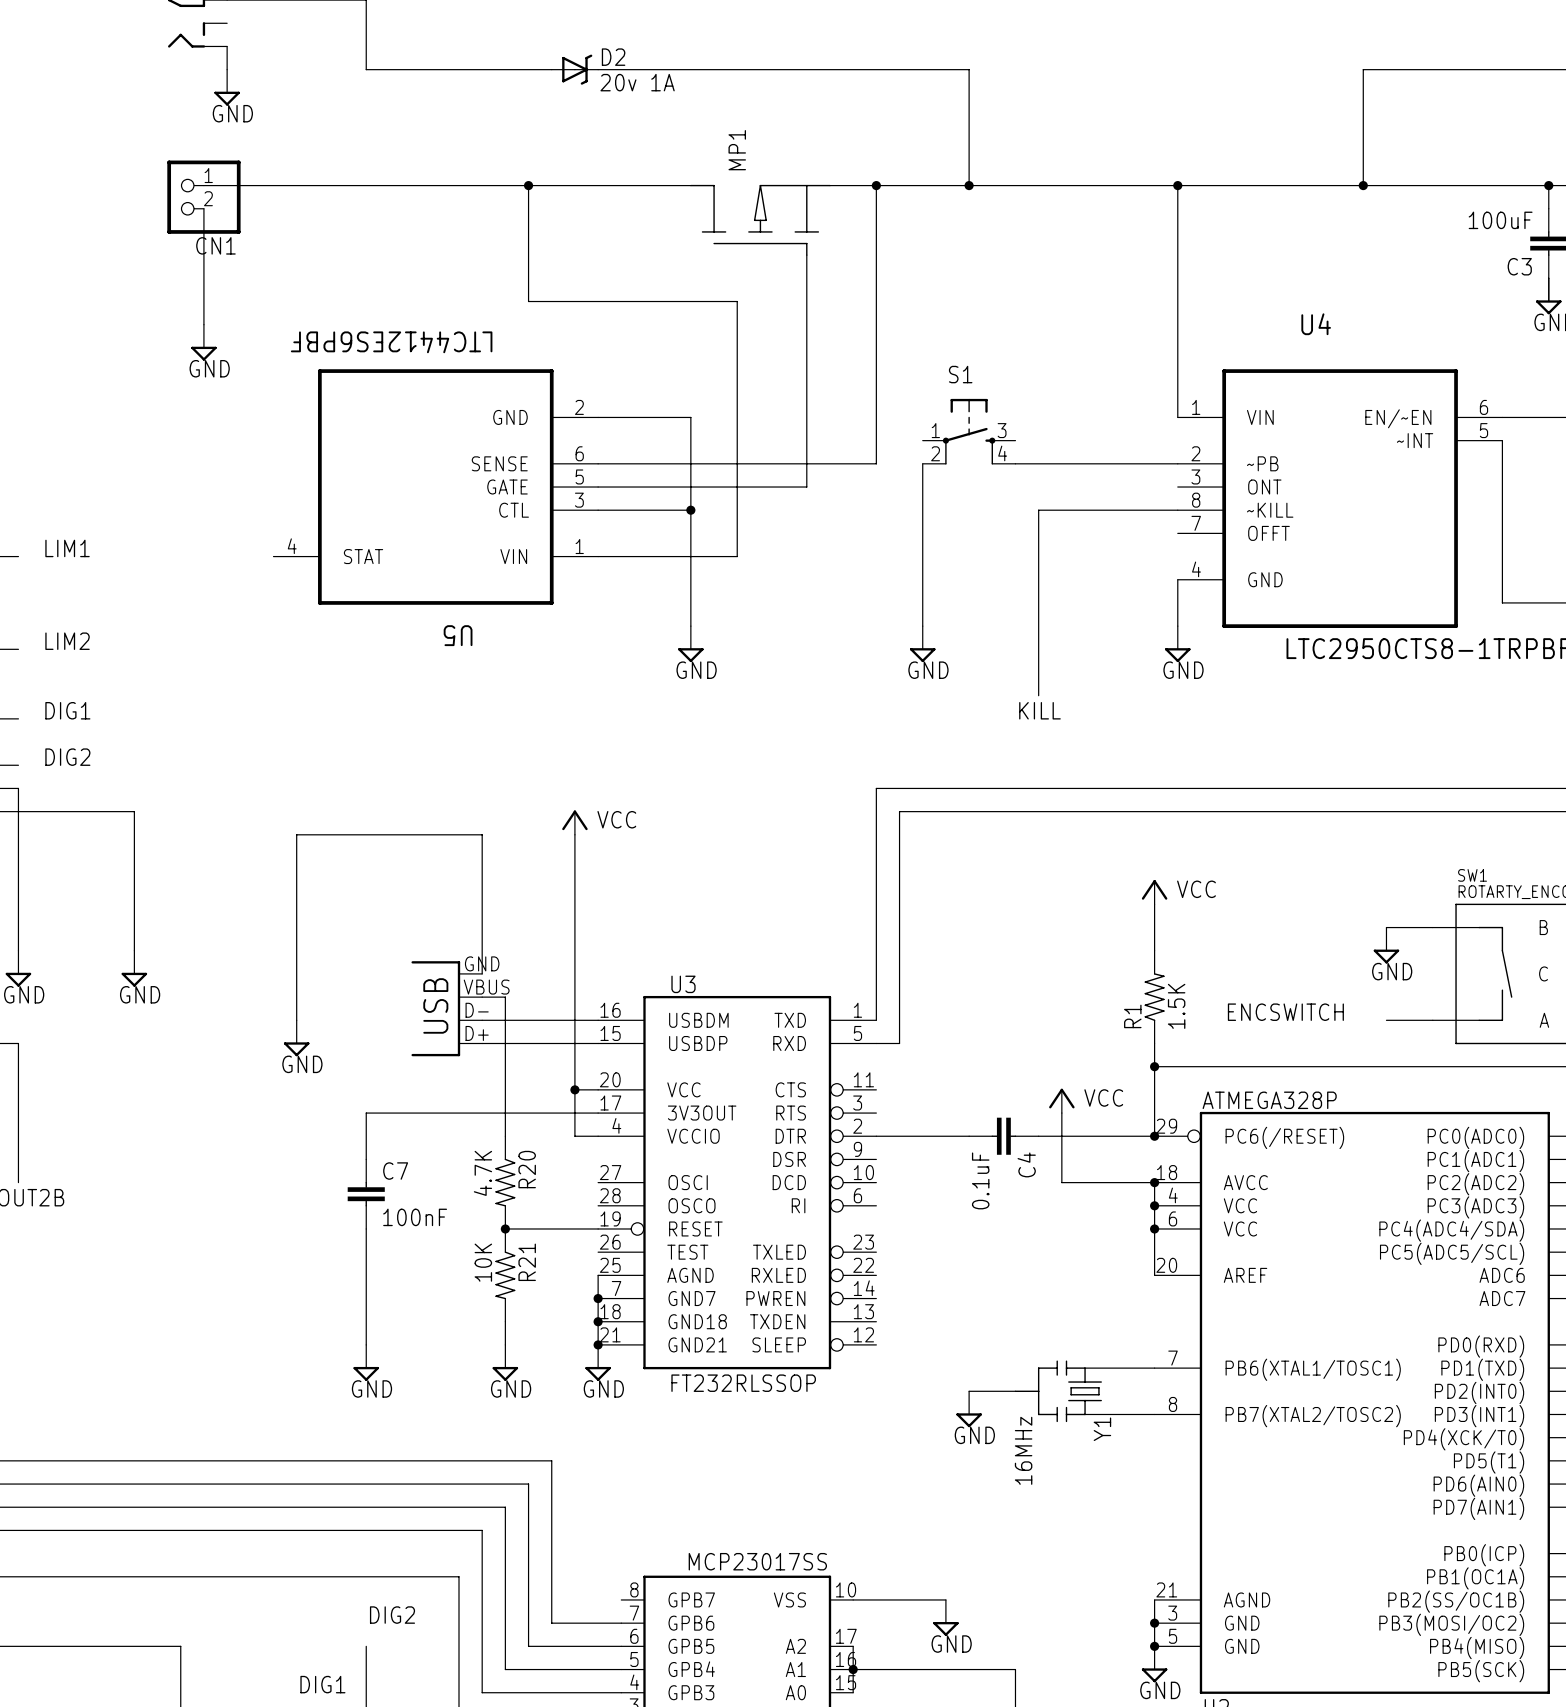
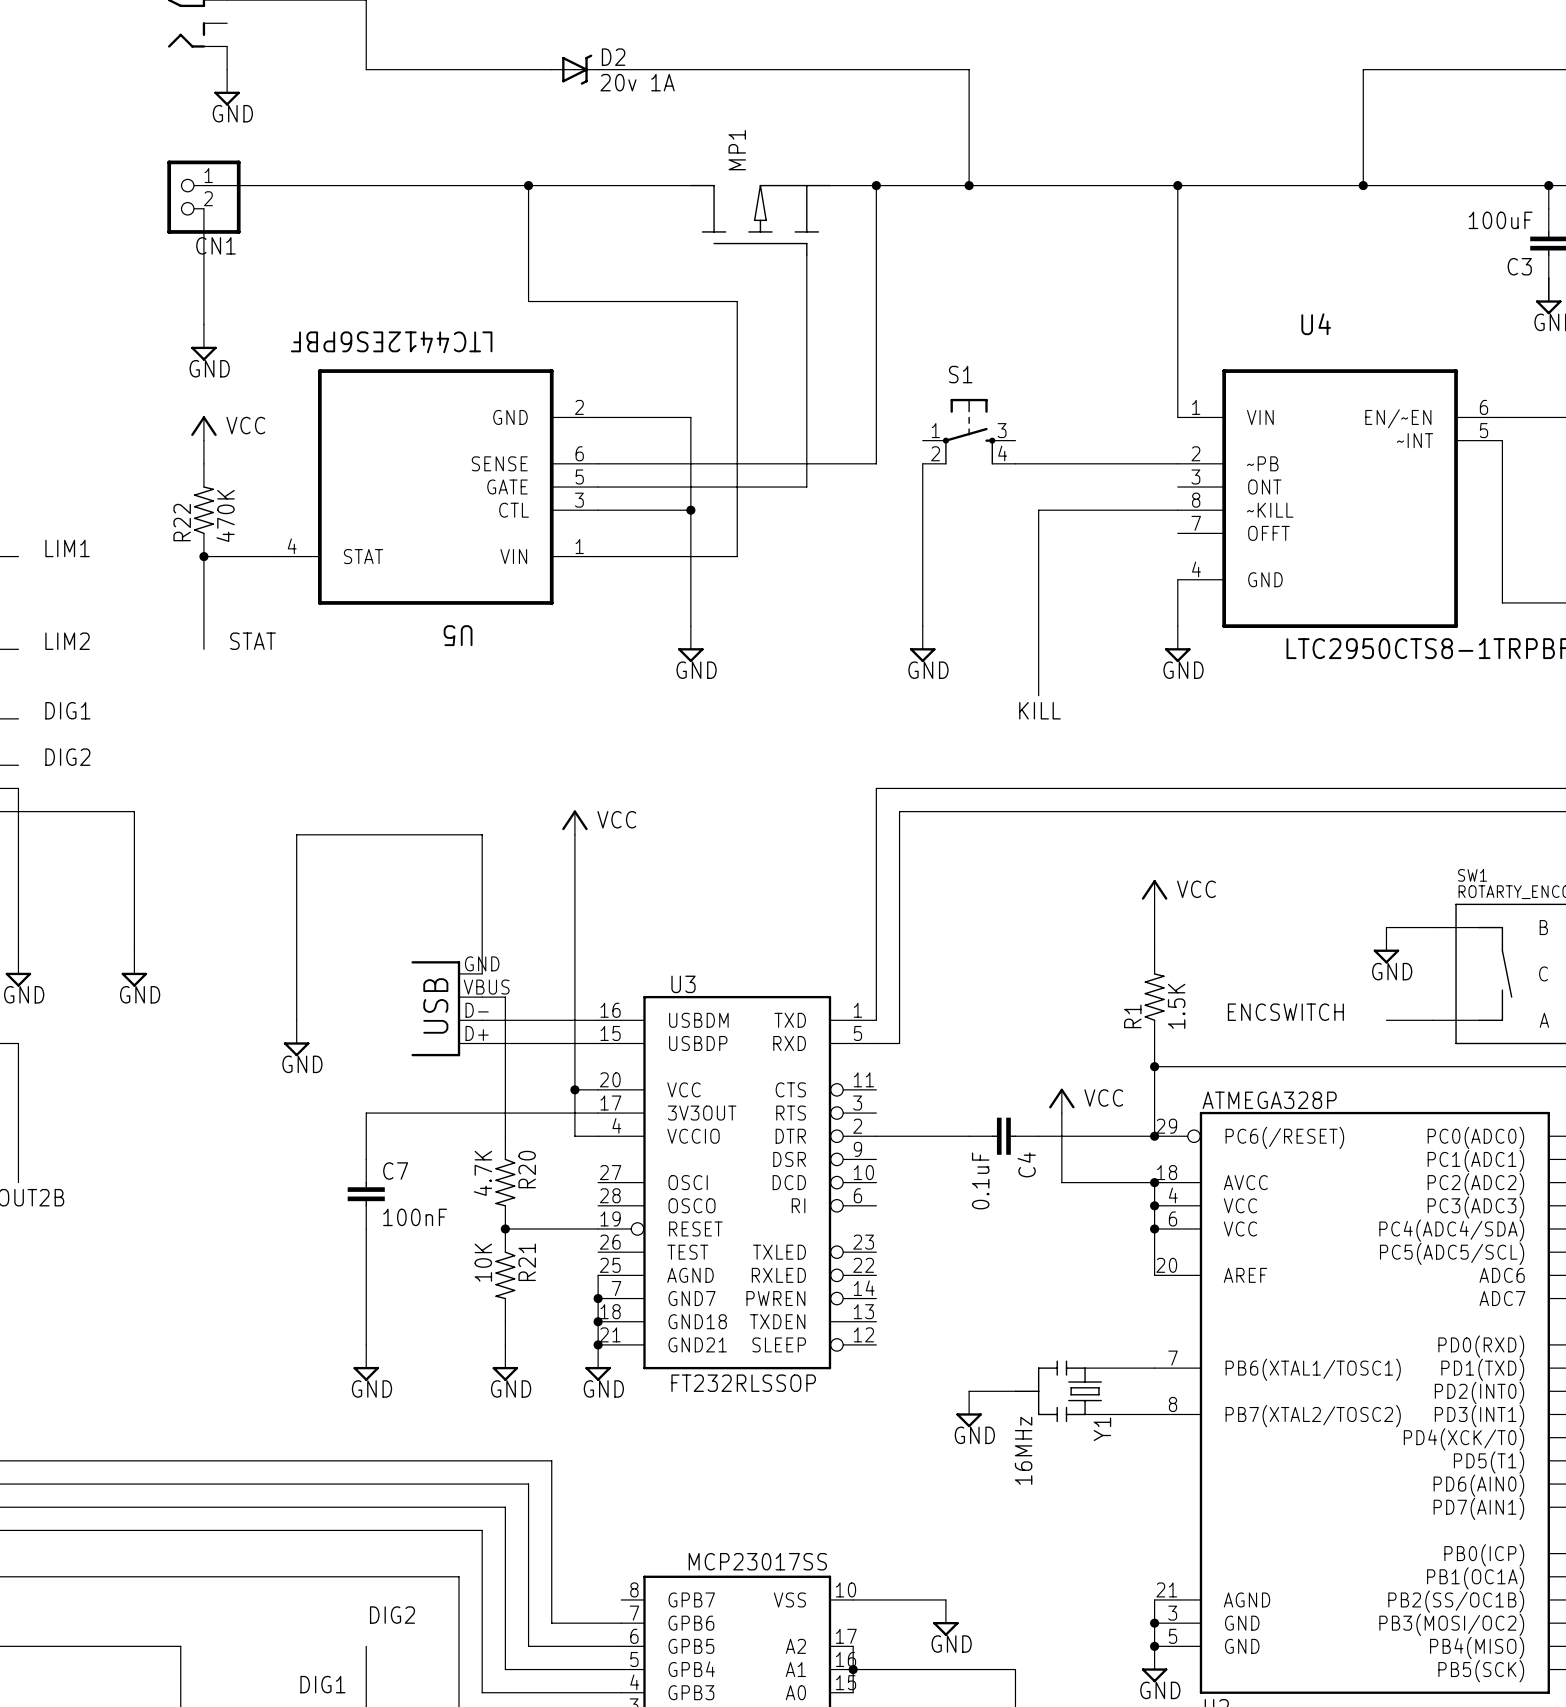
power symbol: none -> VCC (203, 428)
wire: none -> (203, 440) (203, 463)
R22: none -> 470K (203, 510)
junction: none -> (203, 556)
wire: none -> (273, 556) (203, 556) (203, 649)
label: none -> STAT (253, 641)

